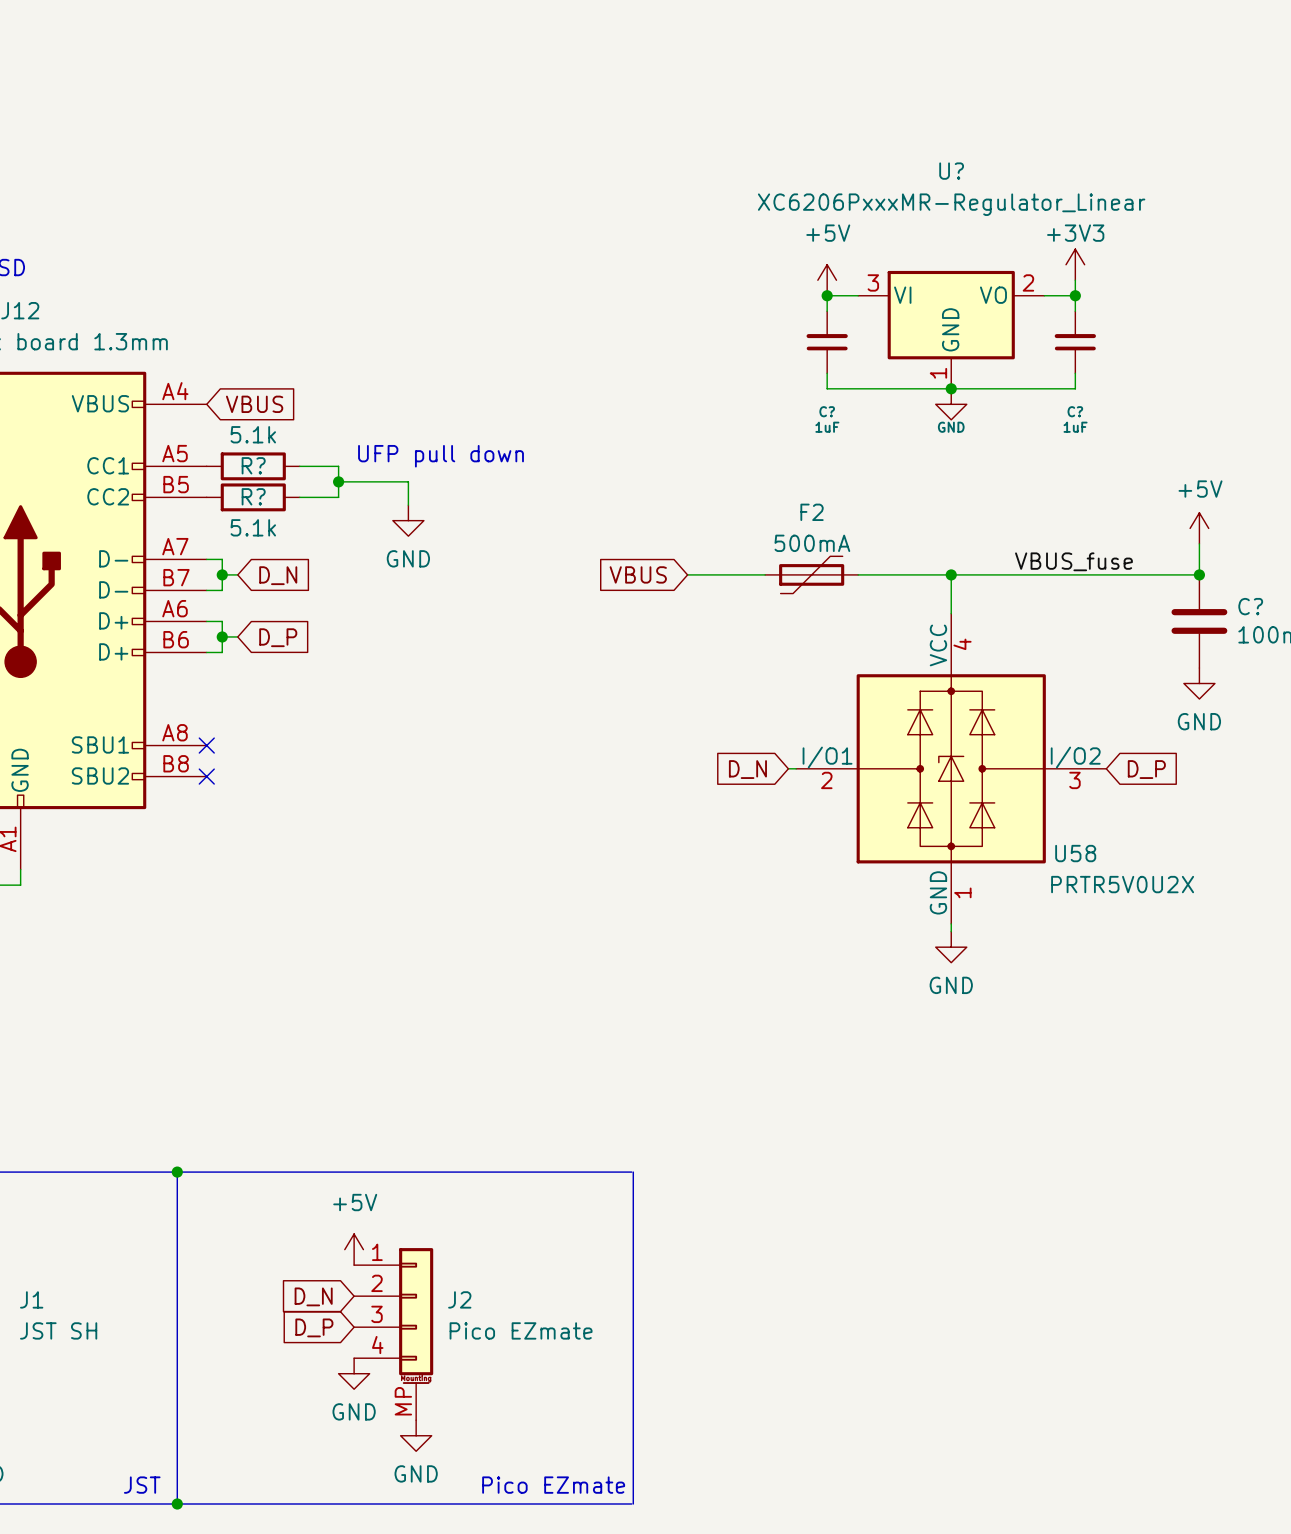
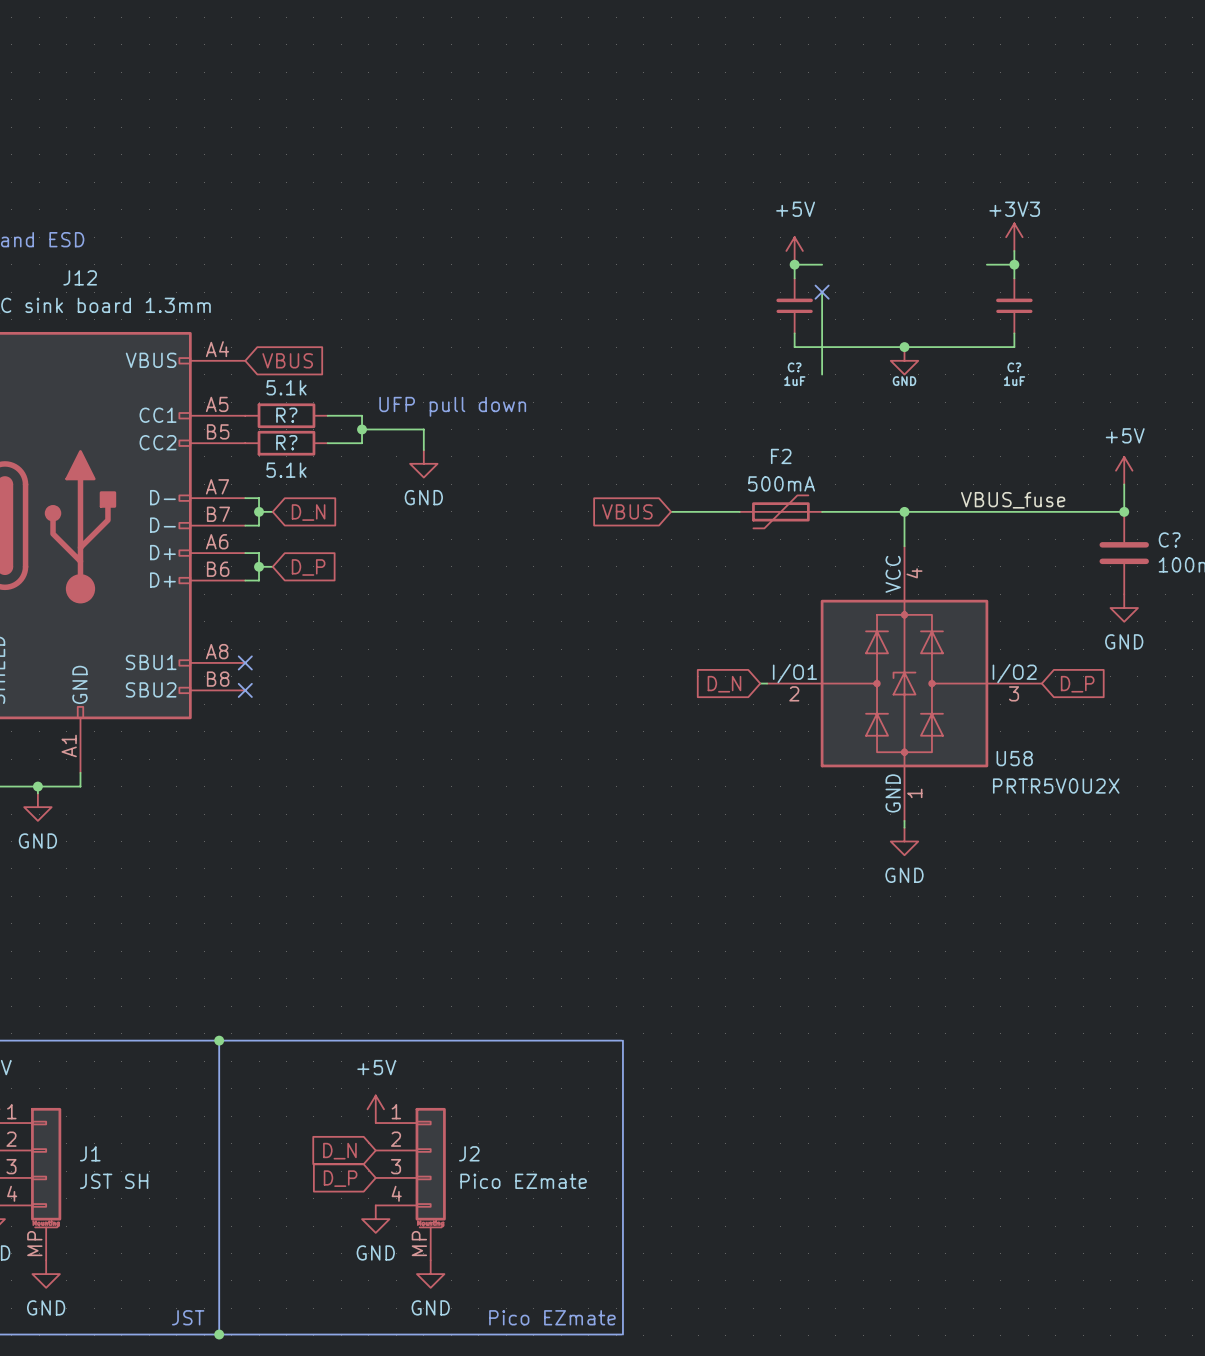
wire: none -> (822, 292) (822, 374)
no-connect mark: none -> (822, 292)
U?: XC6206PxxxMR-Regulator_Linear (951, 329) -> none

